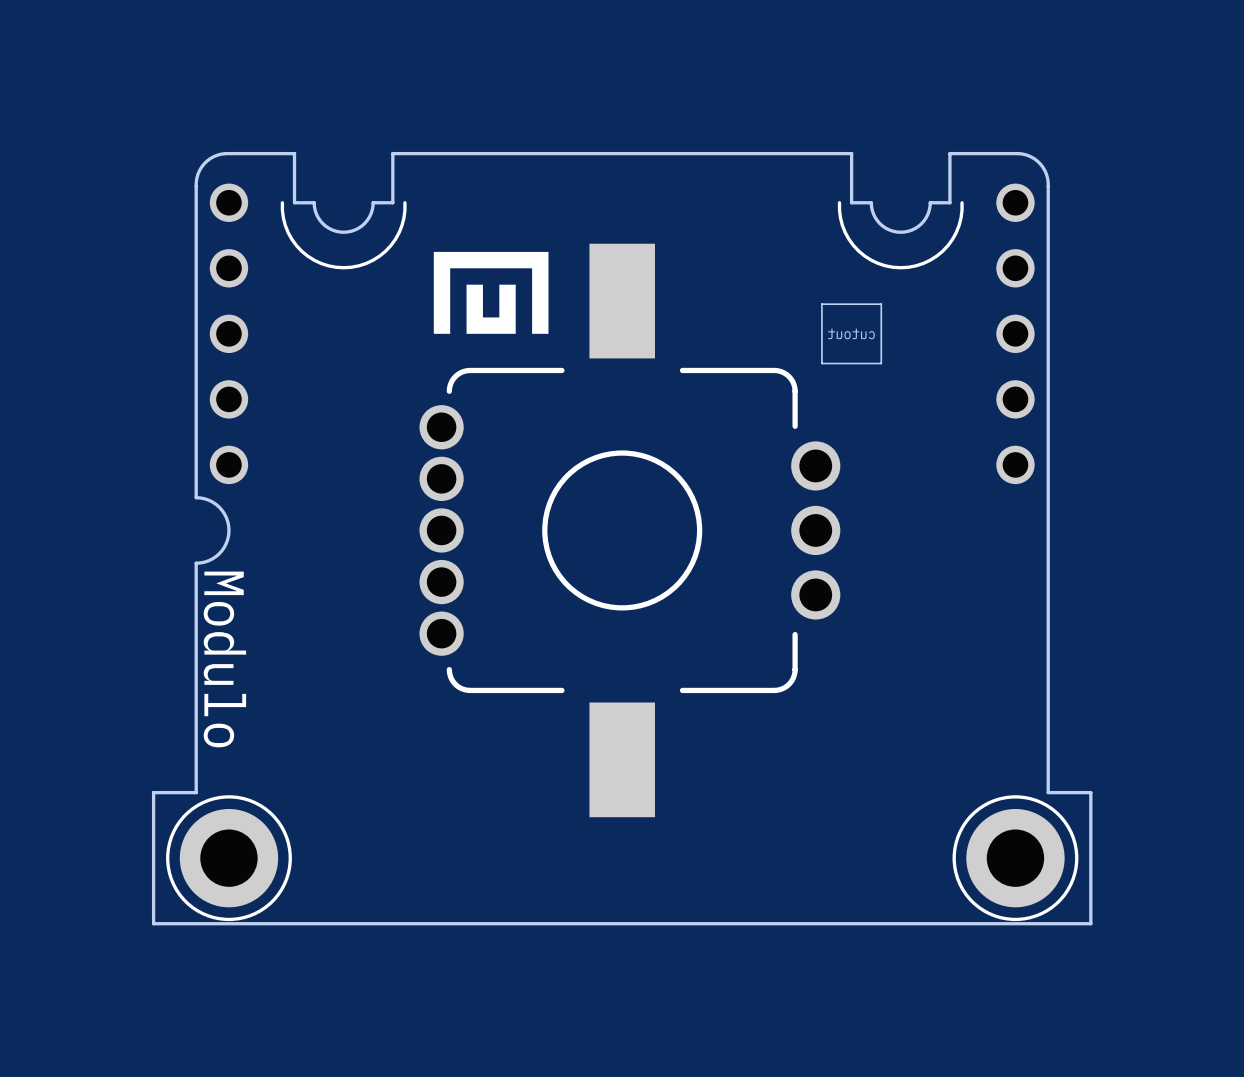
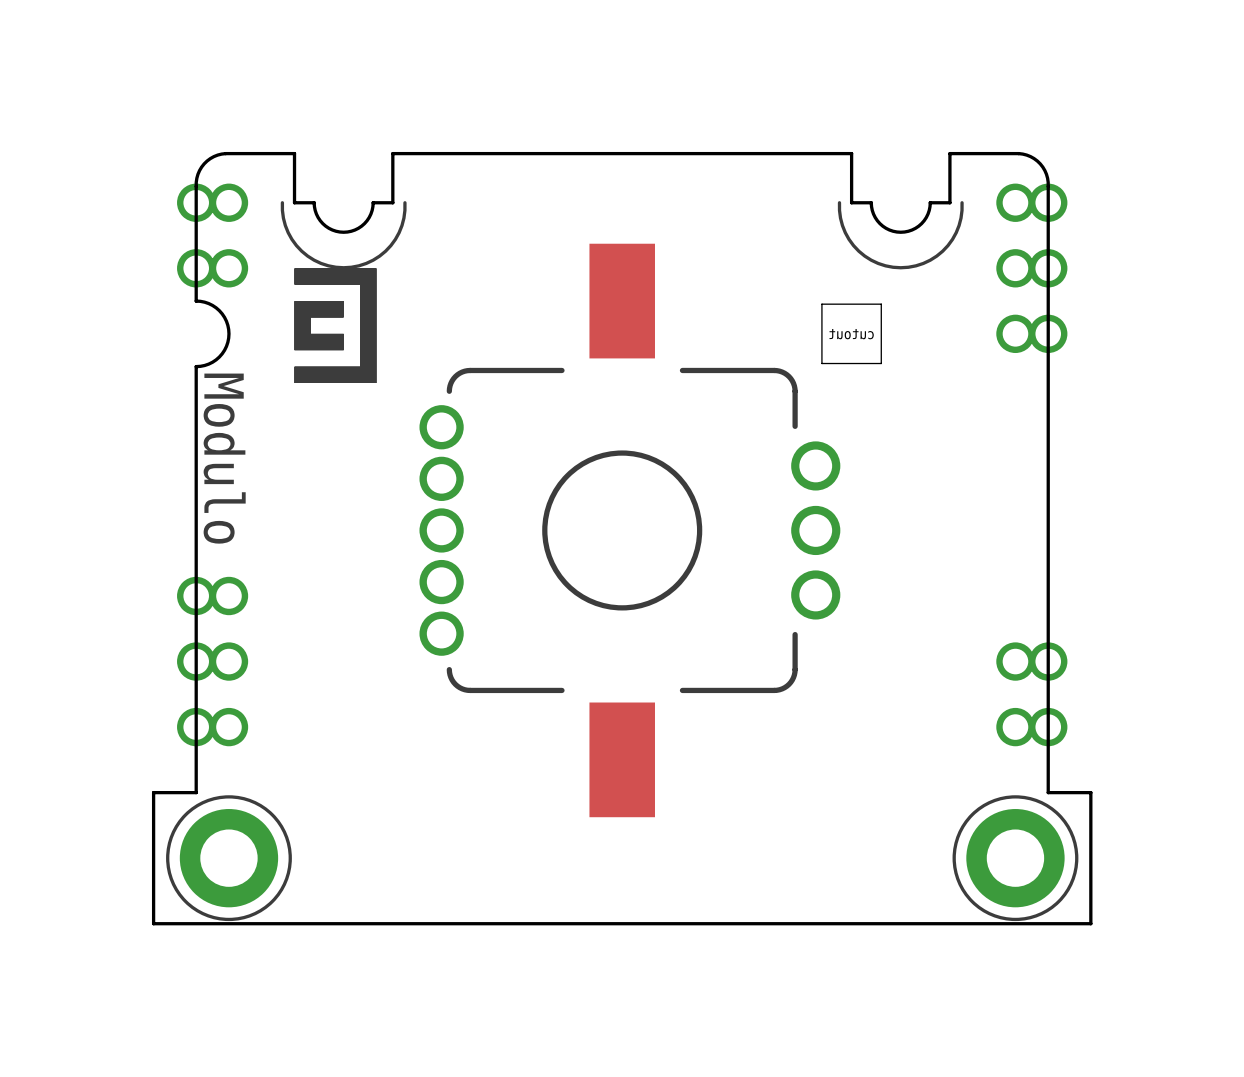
part footprint: [151, 151, 1093, 926] -> [151, 151, 1093, 926]
drawing: [433, 251, 549, 334] -> none
drawing: none -> [294, 268, 377, 383]

